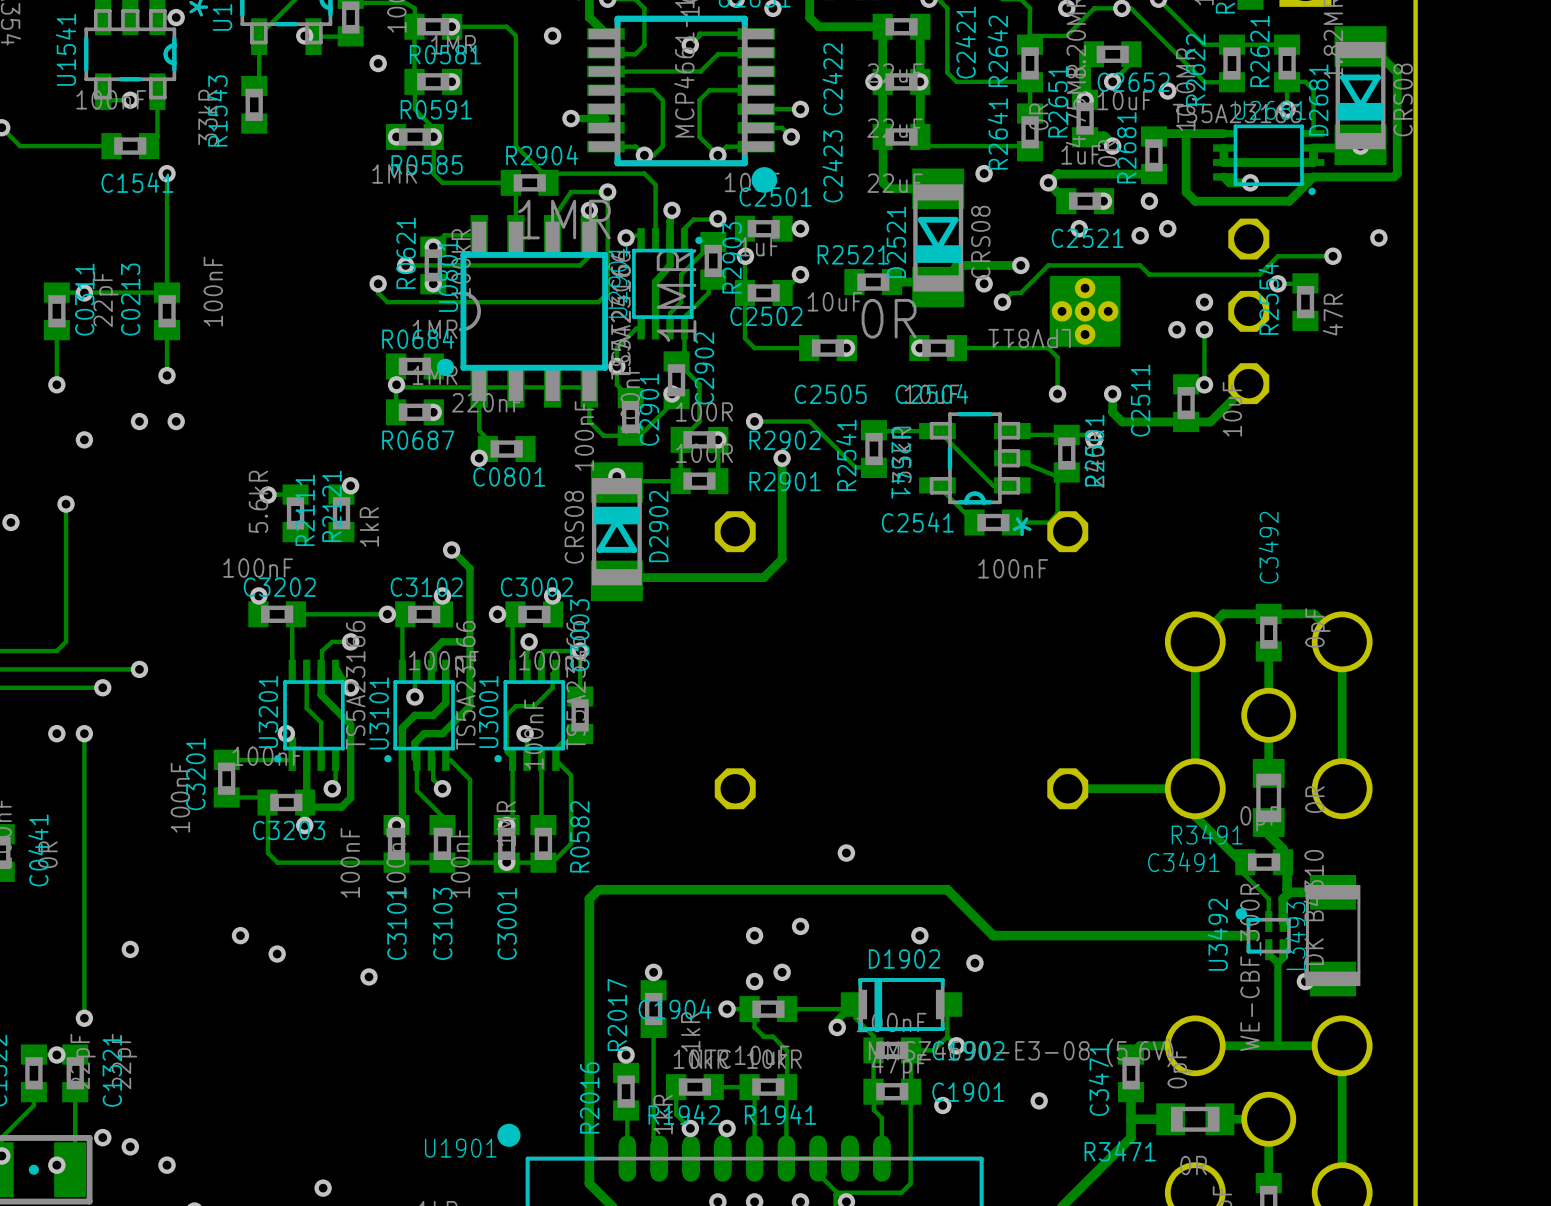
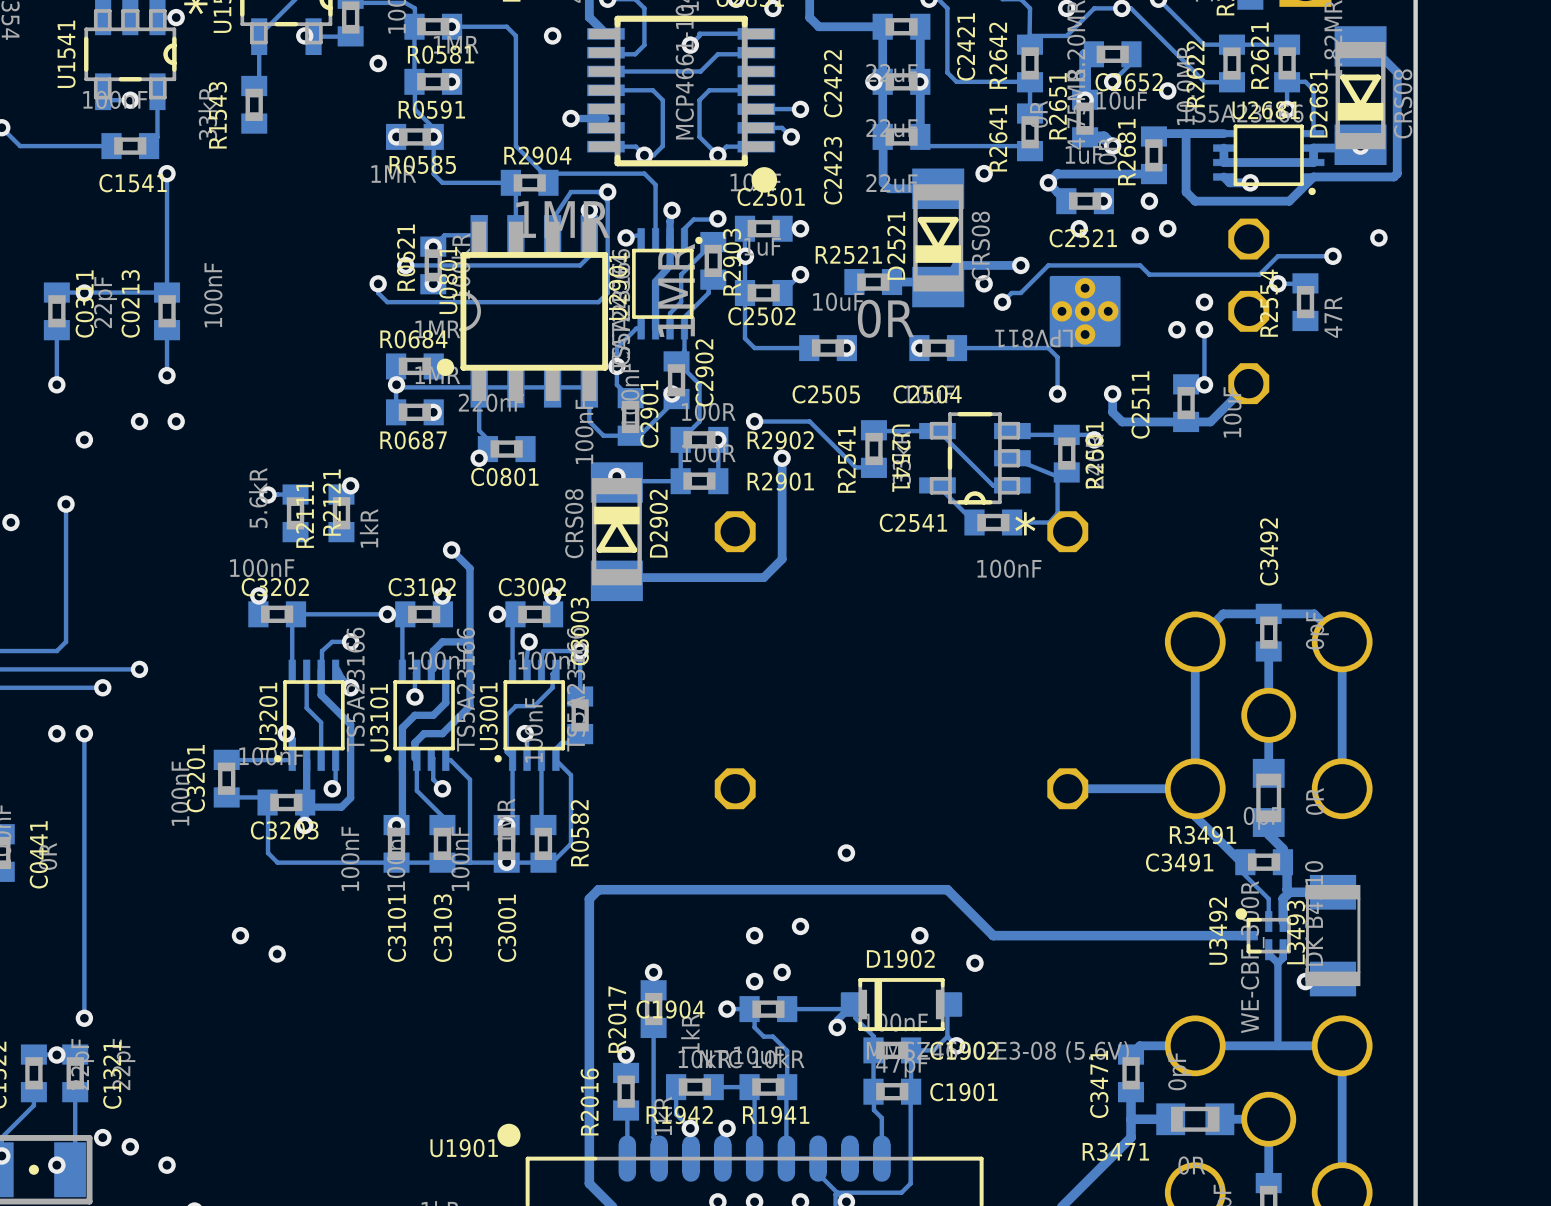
via: (130, 949) -> none
via: (369, 976) -> none
via: (1039, 1100) -> none
via: (942, 1105) -> none
via: (323, 1188) -> none

